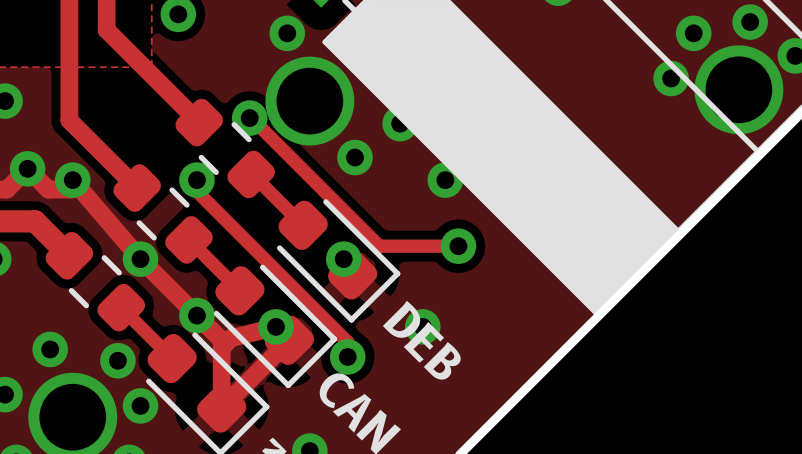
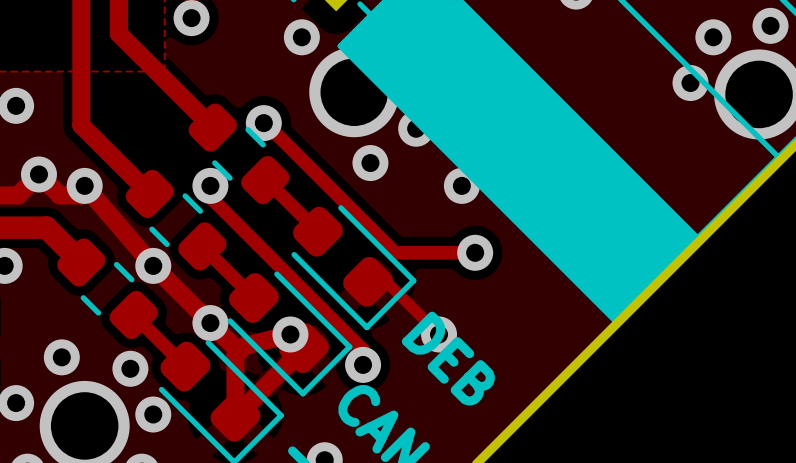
via position: (309, 101) -> (354, 92)
via: (343, 259) -> none
track: none -> (368, 281) (386, 281) (439, 334)

